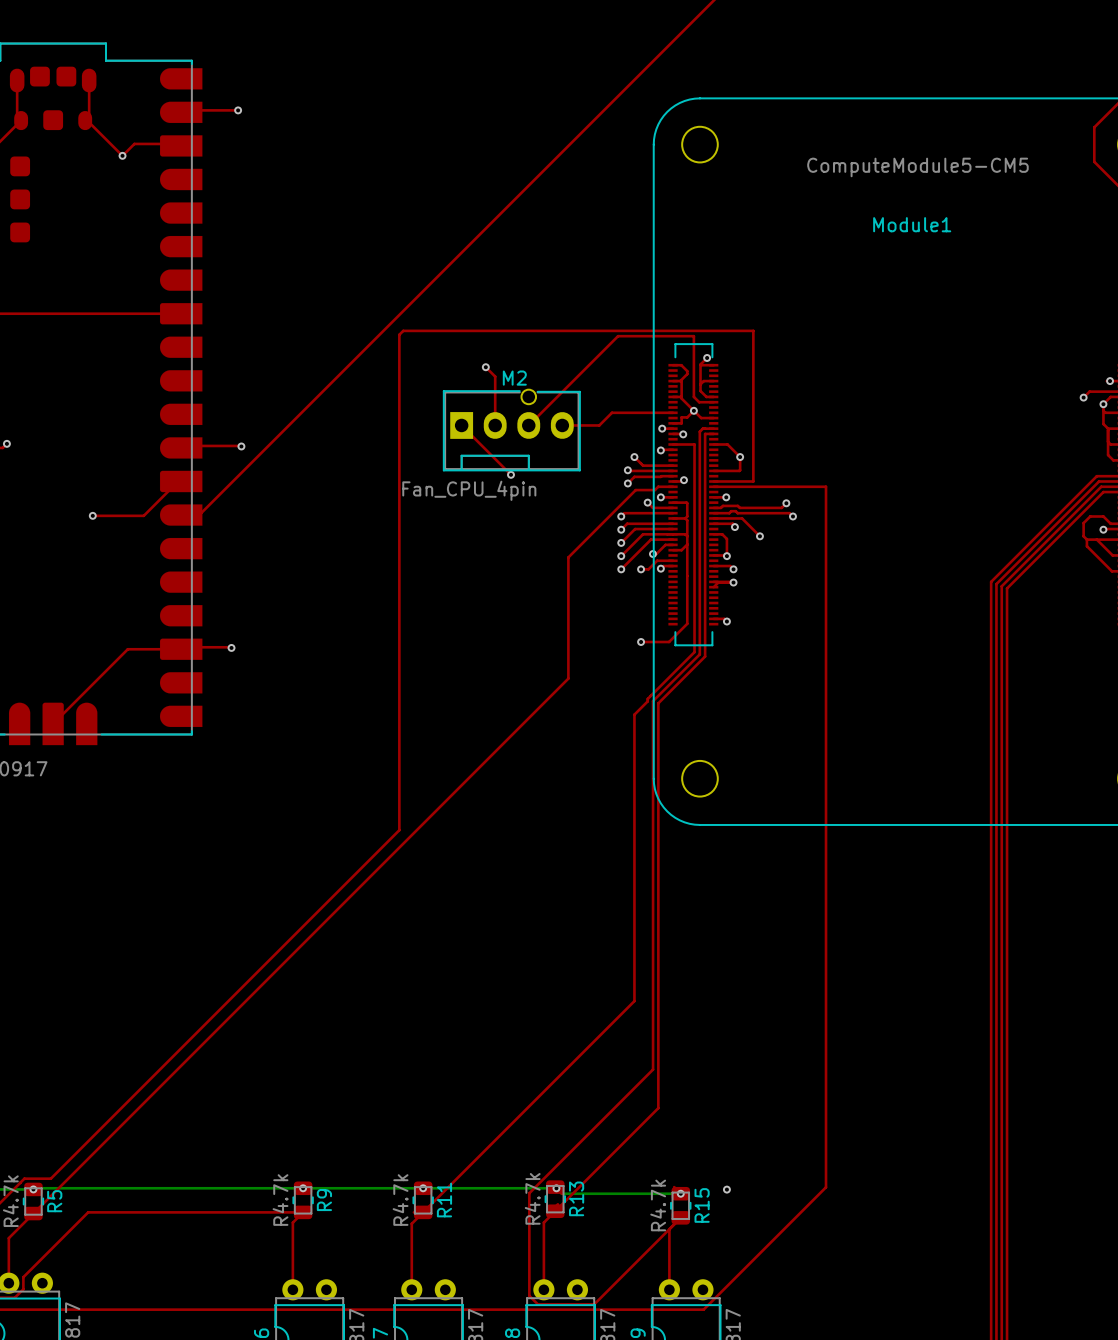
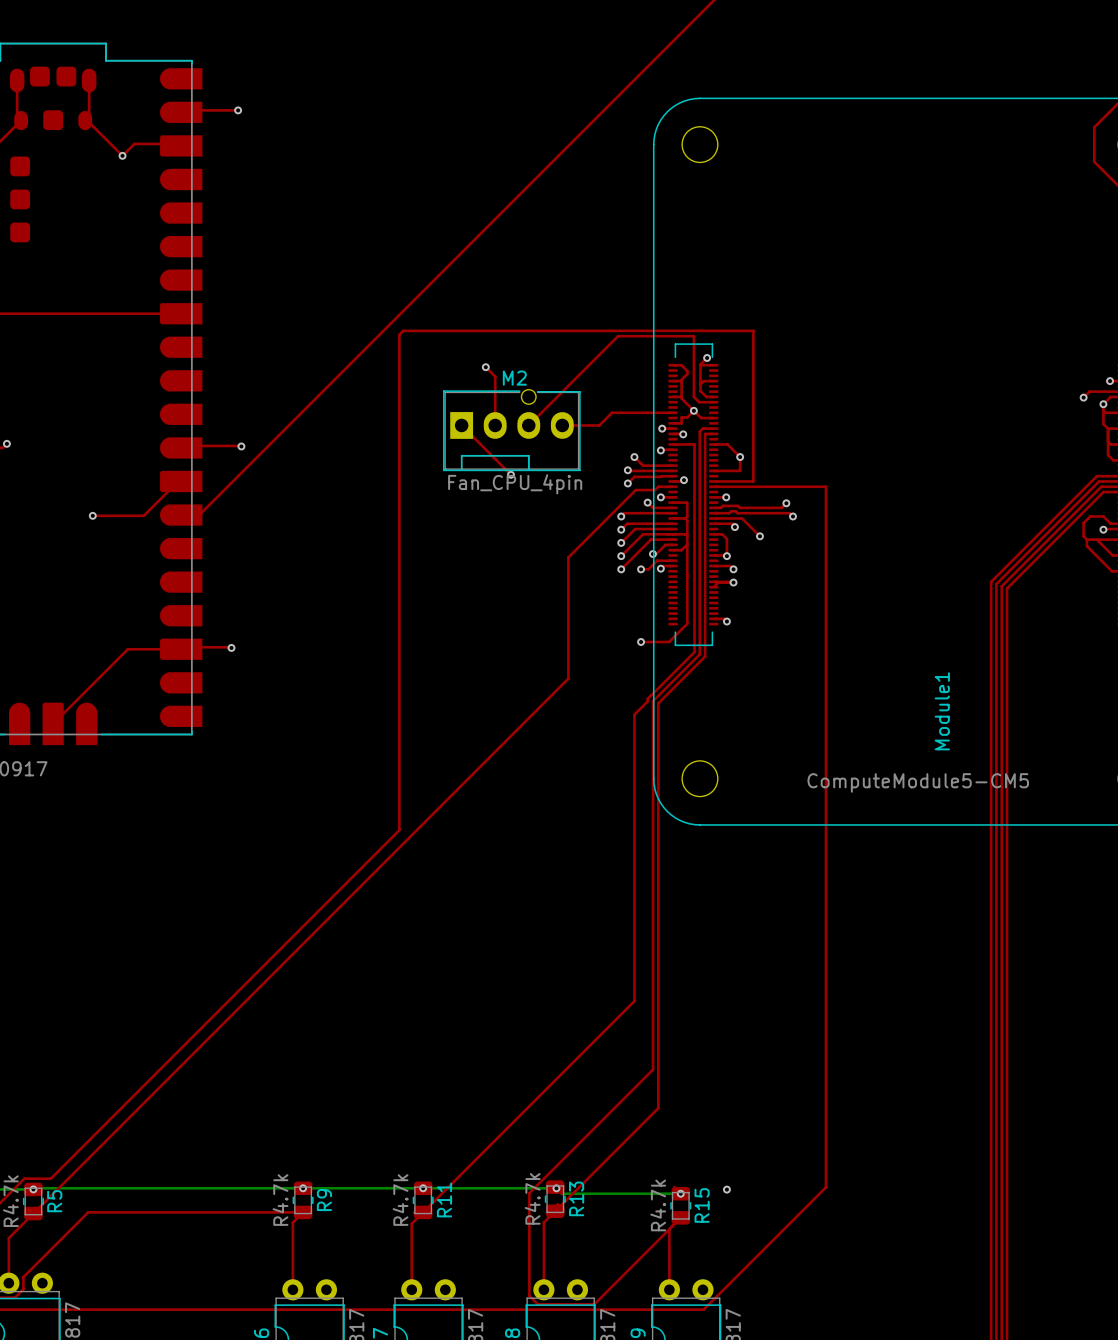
Module1 value position: ComputeModule5-CM5 (917, 167) -> ComputeModule5-CM5 (918, 782)
Module1 name rotation: 0° (912, 224) -> 90° counterclockwise (942, 711)
Module1 name position: Module1 (912, 224) -> Module1 (942, 711)
M2 value position: Fan_CPU_4pin (469, 490) -> Fan_CPU_4pin (515, 484)

